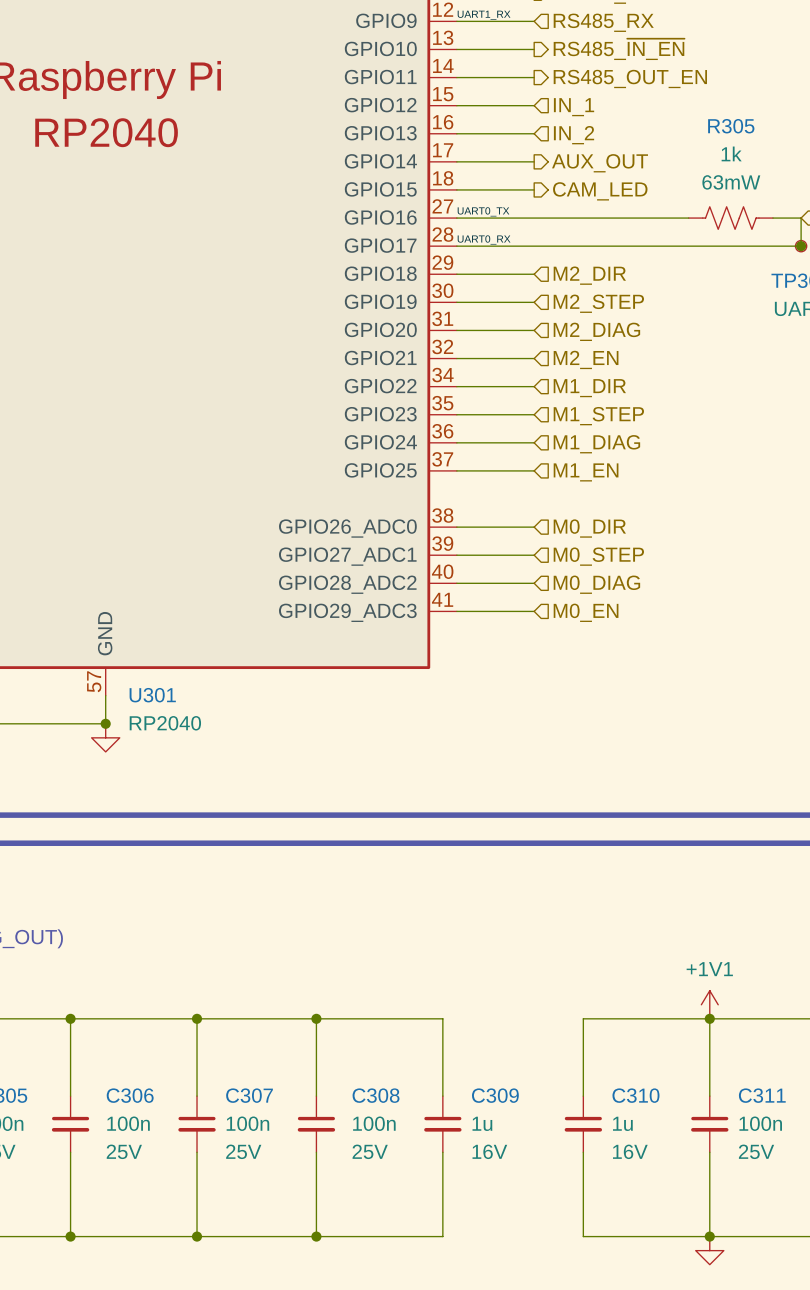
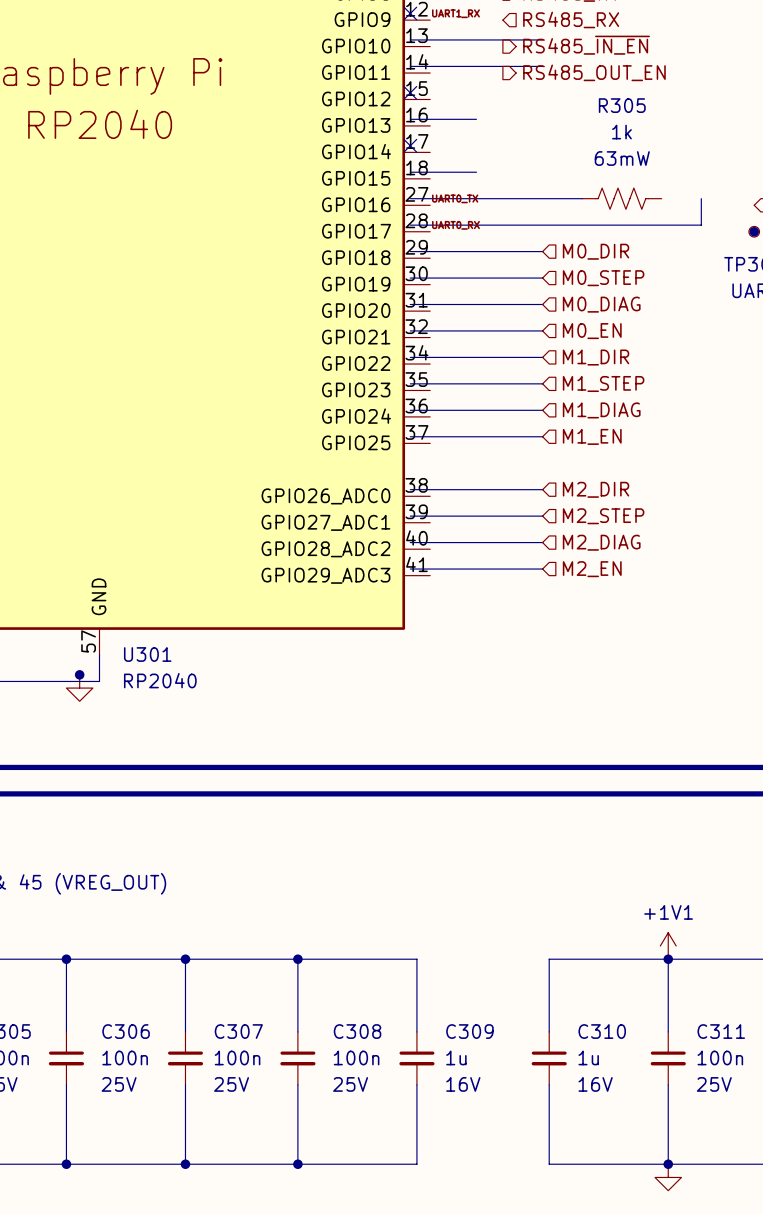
no-connect mark: none -> (410, 13)
wire: (456, 21) (534, 21) -> none
wire: none -> (410, 39) (542, 39)
wire: (456, 49) (534, 49) -> none
wire: none -> (410, 66) (542, 66)
wire: (456, 77) (534, 77) -> none
no-connect mark: none -> (410, 92)
wire: (456, 105) (534, 105) -> none
hierarchical label: IN_1 (574, 107) -> none
wire: none -> (410, 119) (476, 119)
R305 name position: R305 (731, 126) -> R305 (622, 105)
wire: (456, 133) (534, 133) -> none
hierarchical label: IN_2 (574, 135) -> none
R305 value position: 1k (731, 153) -> 1k (621, 132)
no-connect mark: none -> (410, 145)
wire: (456, 161) (534, 161) -> none
hierarchical label: AUX_OUT (600, 163) -> none
wire: none -> (410, 172) (476, 172)
R305 text position: 63mW (731, 182) -> 63mW (622, 158)
wire: (456, 189) (534, 189) -> none
hierarchical label: CAM_LED (600, 191) -> none
wire: none -> (410, 198) (582, 198)
wire: none -> (701, 198) (701, 225) (410, 225)
wire: (456, 218) (688, 218) -> none
R305 position: (730, 218) -> (621, 198)
wire: (773, 218) (801, 218) (801, 246) (456, 246) -> none
wire: none -> (410, 251) (542, 251)
wire: (456, 274) (534, 274) -> none
hierarchical label position: M2_DIR (589, 275) -> M2_DIR (596, 489)
wire: none -> (410, 278) (542, 278)
wire: (456, 302) (534, 302) -> none
hierarchical label position: M2_STEP (598, 303) -> M2_STEP (603, 516)
wire: none -> (410, 304) (542, 304)
wire: (456, 330) (534, 330) -> none
hierarchical label position: M2_DIAG (596, 331) -> M2_DIAG (601, 542)
wire: none -> (410, 330) (542, 330)
wire: (456, 358) (534, 358) -> none
hierarchical label position: M2_EN (586, 359) -> M2_EN (592, 569)
wire: none -> (410, 357) (542, 357)
wire: (456, 386) (534, 386) -> none
hierarchical label position: M1_DIR (589, 388) -> M1_DIR (596, 357)
wire: none -> (410, 383) (542, 383)
wire: (456, 414) (534, 414) -> none
hierarchical label position: M1_STEP (598, 416) -> M1_STEP (603, 383)
wire: none -> (410, 410) (542, 410)
wire: (456, 442) (534, 442) -> none
hierarchical label position: M1_DIAG (596, 444) -> M1_DIAG (601, 410)
wire: none -> (410, 436) (542, 436)
wire: (456, 470) (534, 470) -> none
hierarchical label position: M1_EN (586, 472) -> M1_EN (592, 436)
wire: none -> (410, 489) (542, 489)
wire: (456, 527) (534, 527) -> none
hierarchical label position: M0_DIR (589, 528) -> M0_DIR (596, 251)
wire: none -> (410, 516) (542, 516)
wire: (456, 555) (534, 555) -> none
hierarchical label position: M0_STEP (598, 556) -> M0_STEP (603, 278)
wire: none -> (410, 542) (542, 542)
wire: (456, 583) (534, 583) -> none
hierarchical label position: M0_DIAG (596, 584) -> M0_DIAG (601, 304)
wire: none -> (410, 569) (542, 569)
wire: (456, 611) (534, 611) -> none
hierarchical label position: M0_EN (586, 612) -> M0_EN (592, 331)
junction position: (105, 723) -> (79, 674)
power symbol position: (105, 737) -> (79, 688)

